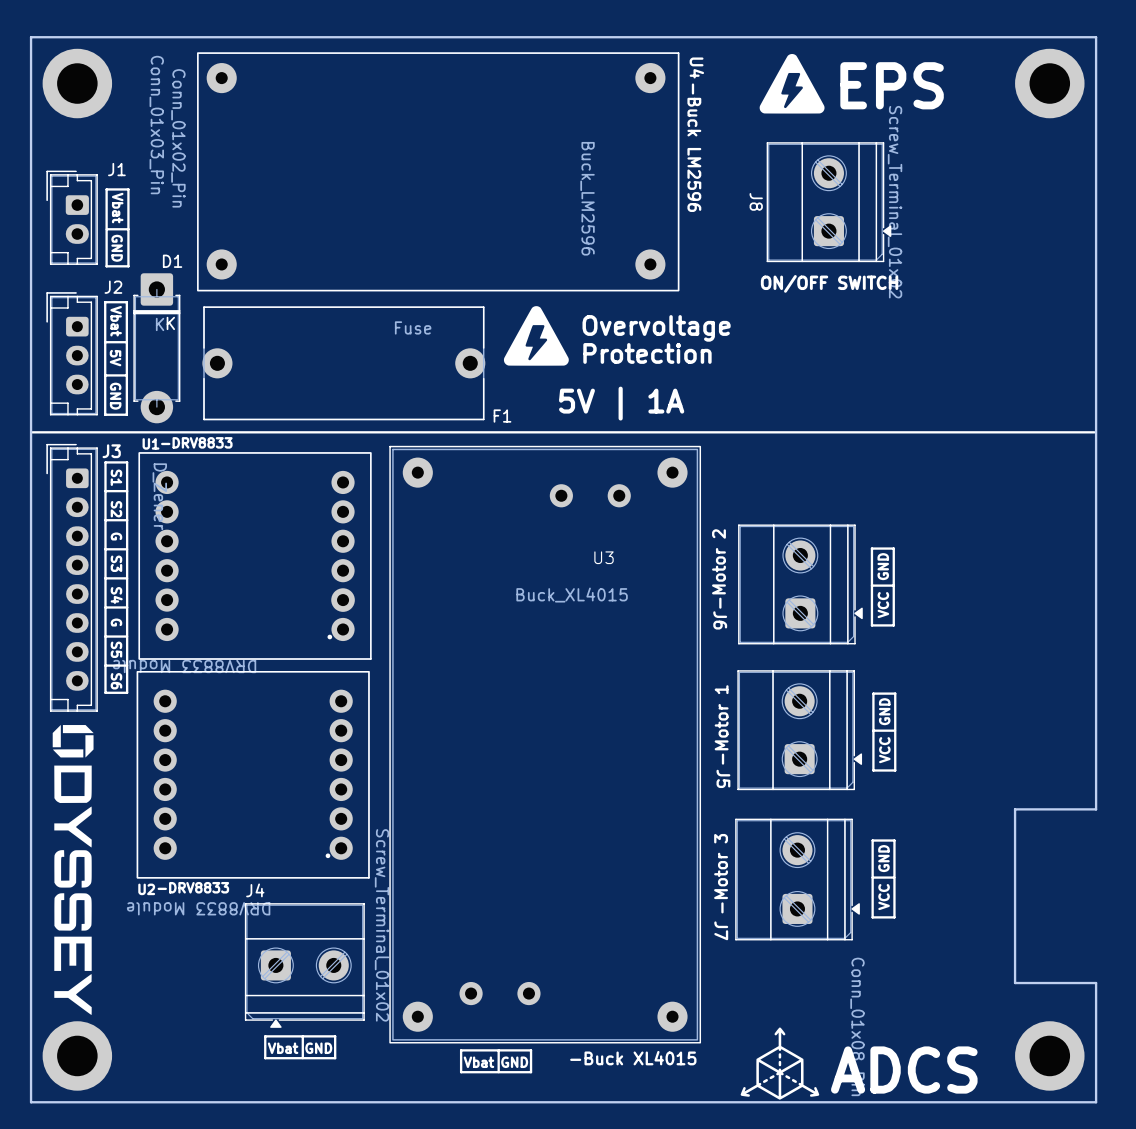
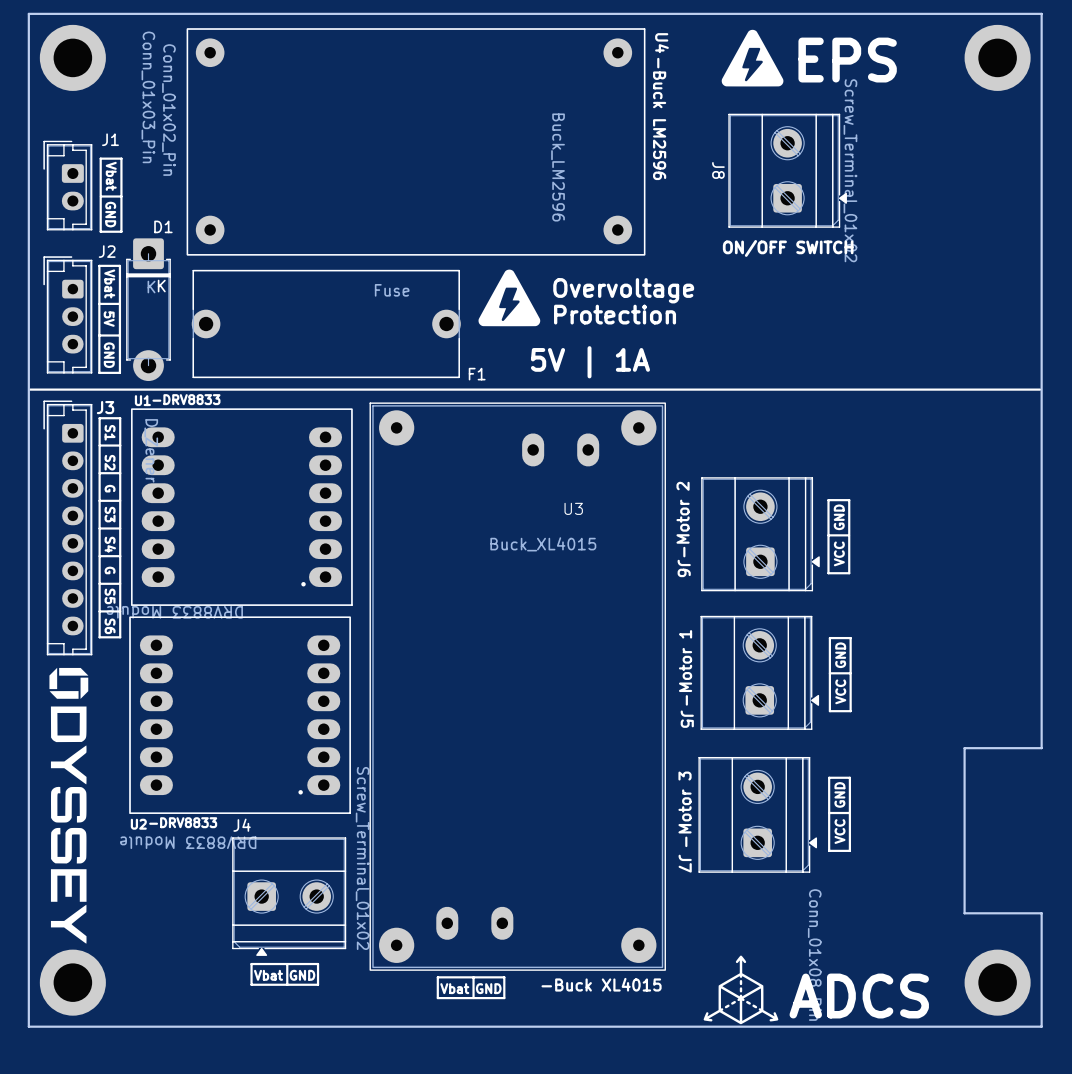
U3 footprint: [389, 445, 702, 1044] -> [369, 402, 666, 971]
U1 footprint: [138, 452, 372, 660] -> [131, 408, 353, 606]
U2 footprint: [136, 671, 370, 879] -> [129, 616, 351, 814]

